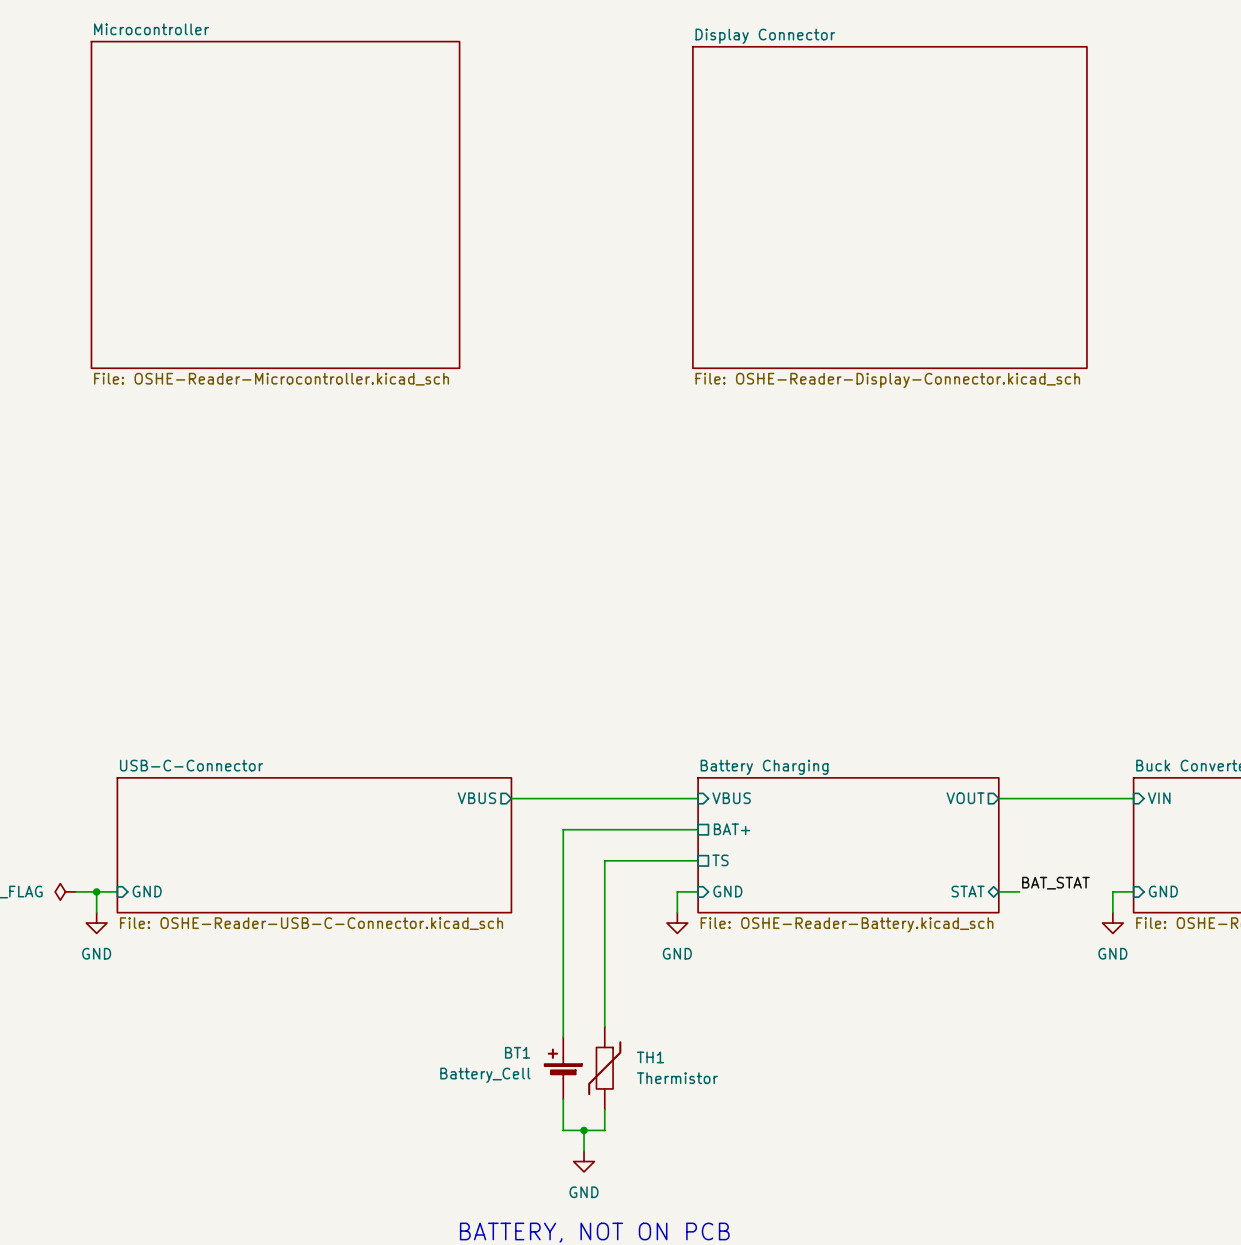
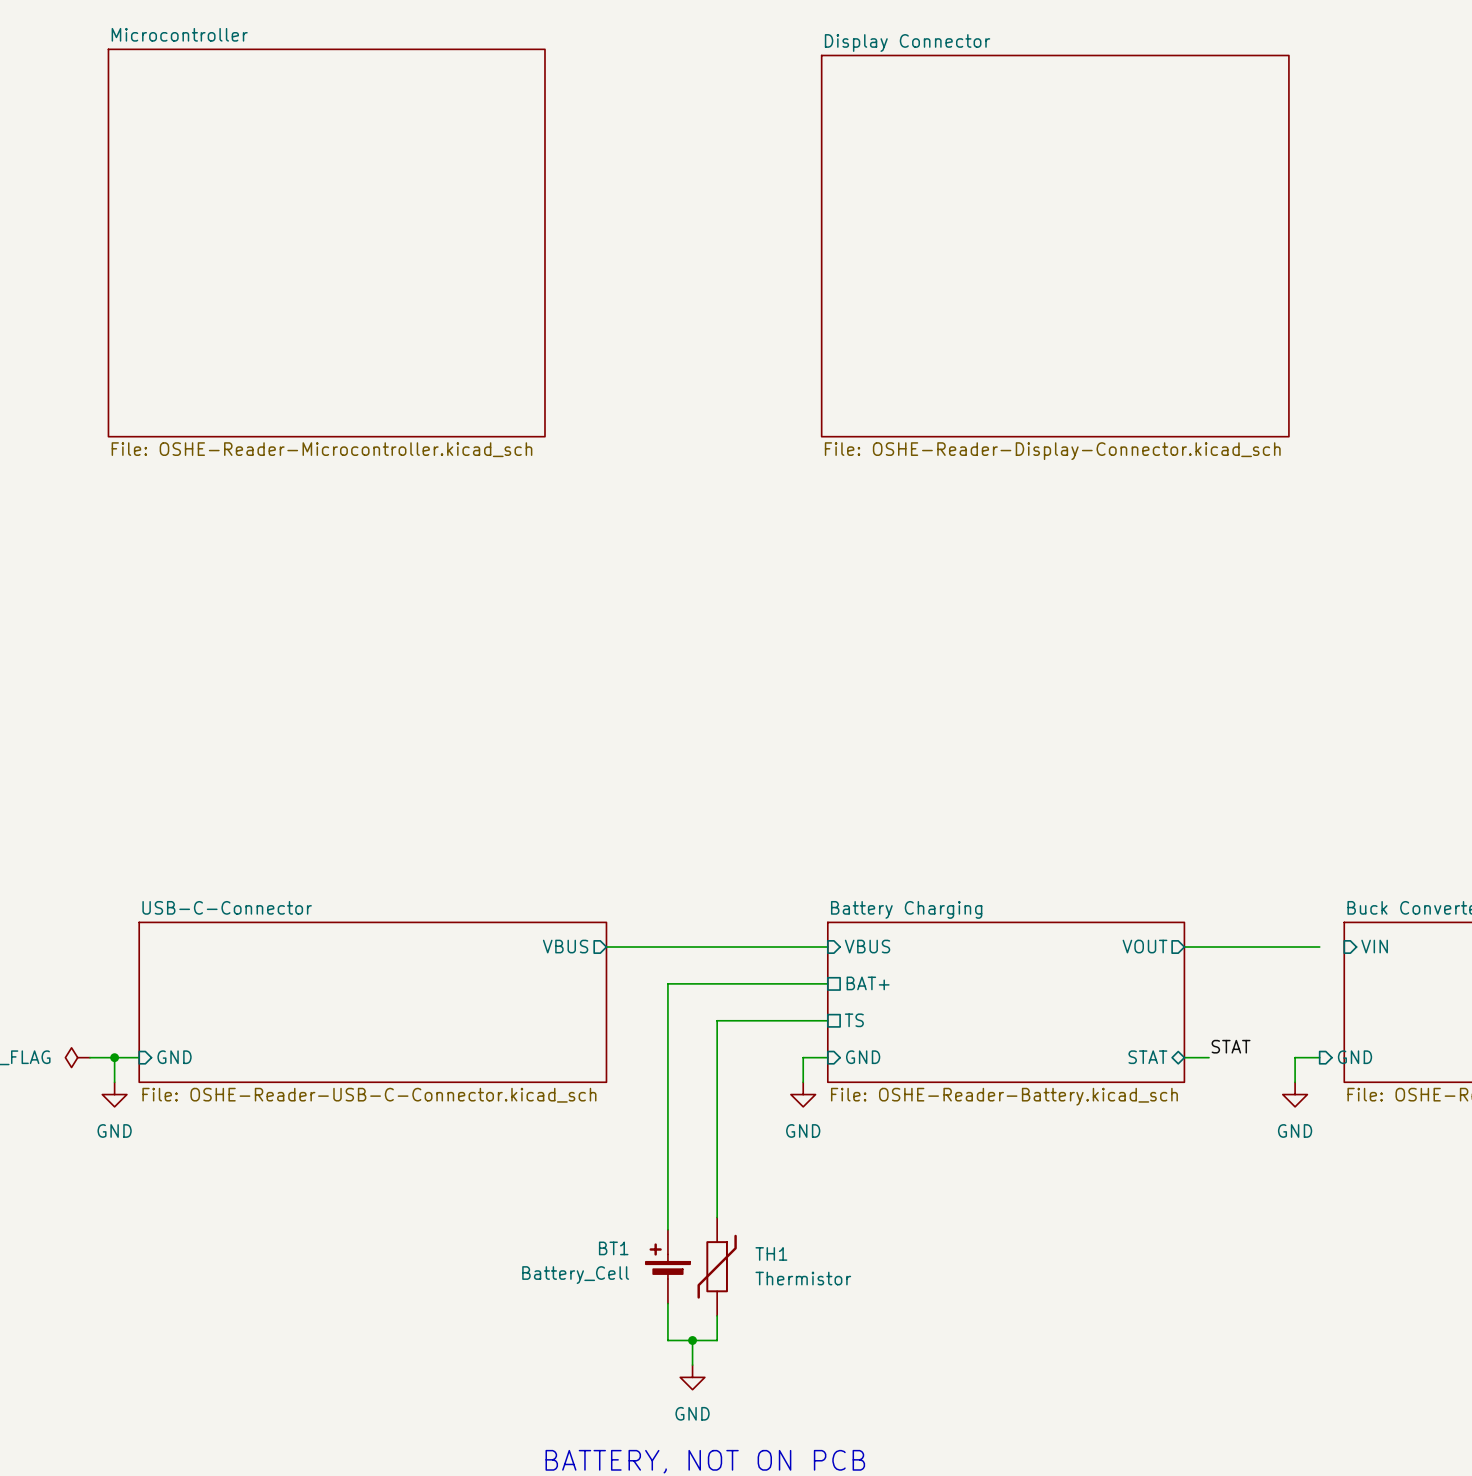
wire: (1112, 798) (1133, 798) -> none
label: BAT_STAT (1055, 883) -> STAT (1231, 1046)
wire: (1133, 891) (1112, 891) (1112, 912) -> (1319, 1057) (1295, 1057) (1295, 1082)
sheet pin position: GND (1163, 891) -> GND (1355, 1057)
power symbol position: GND (1112, 923) -> GND (1295, 1094)

